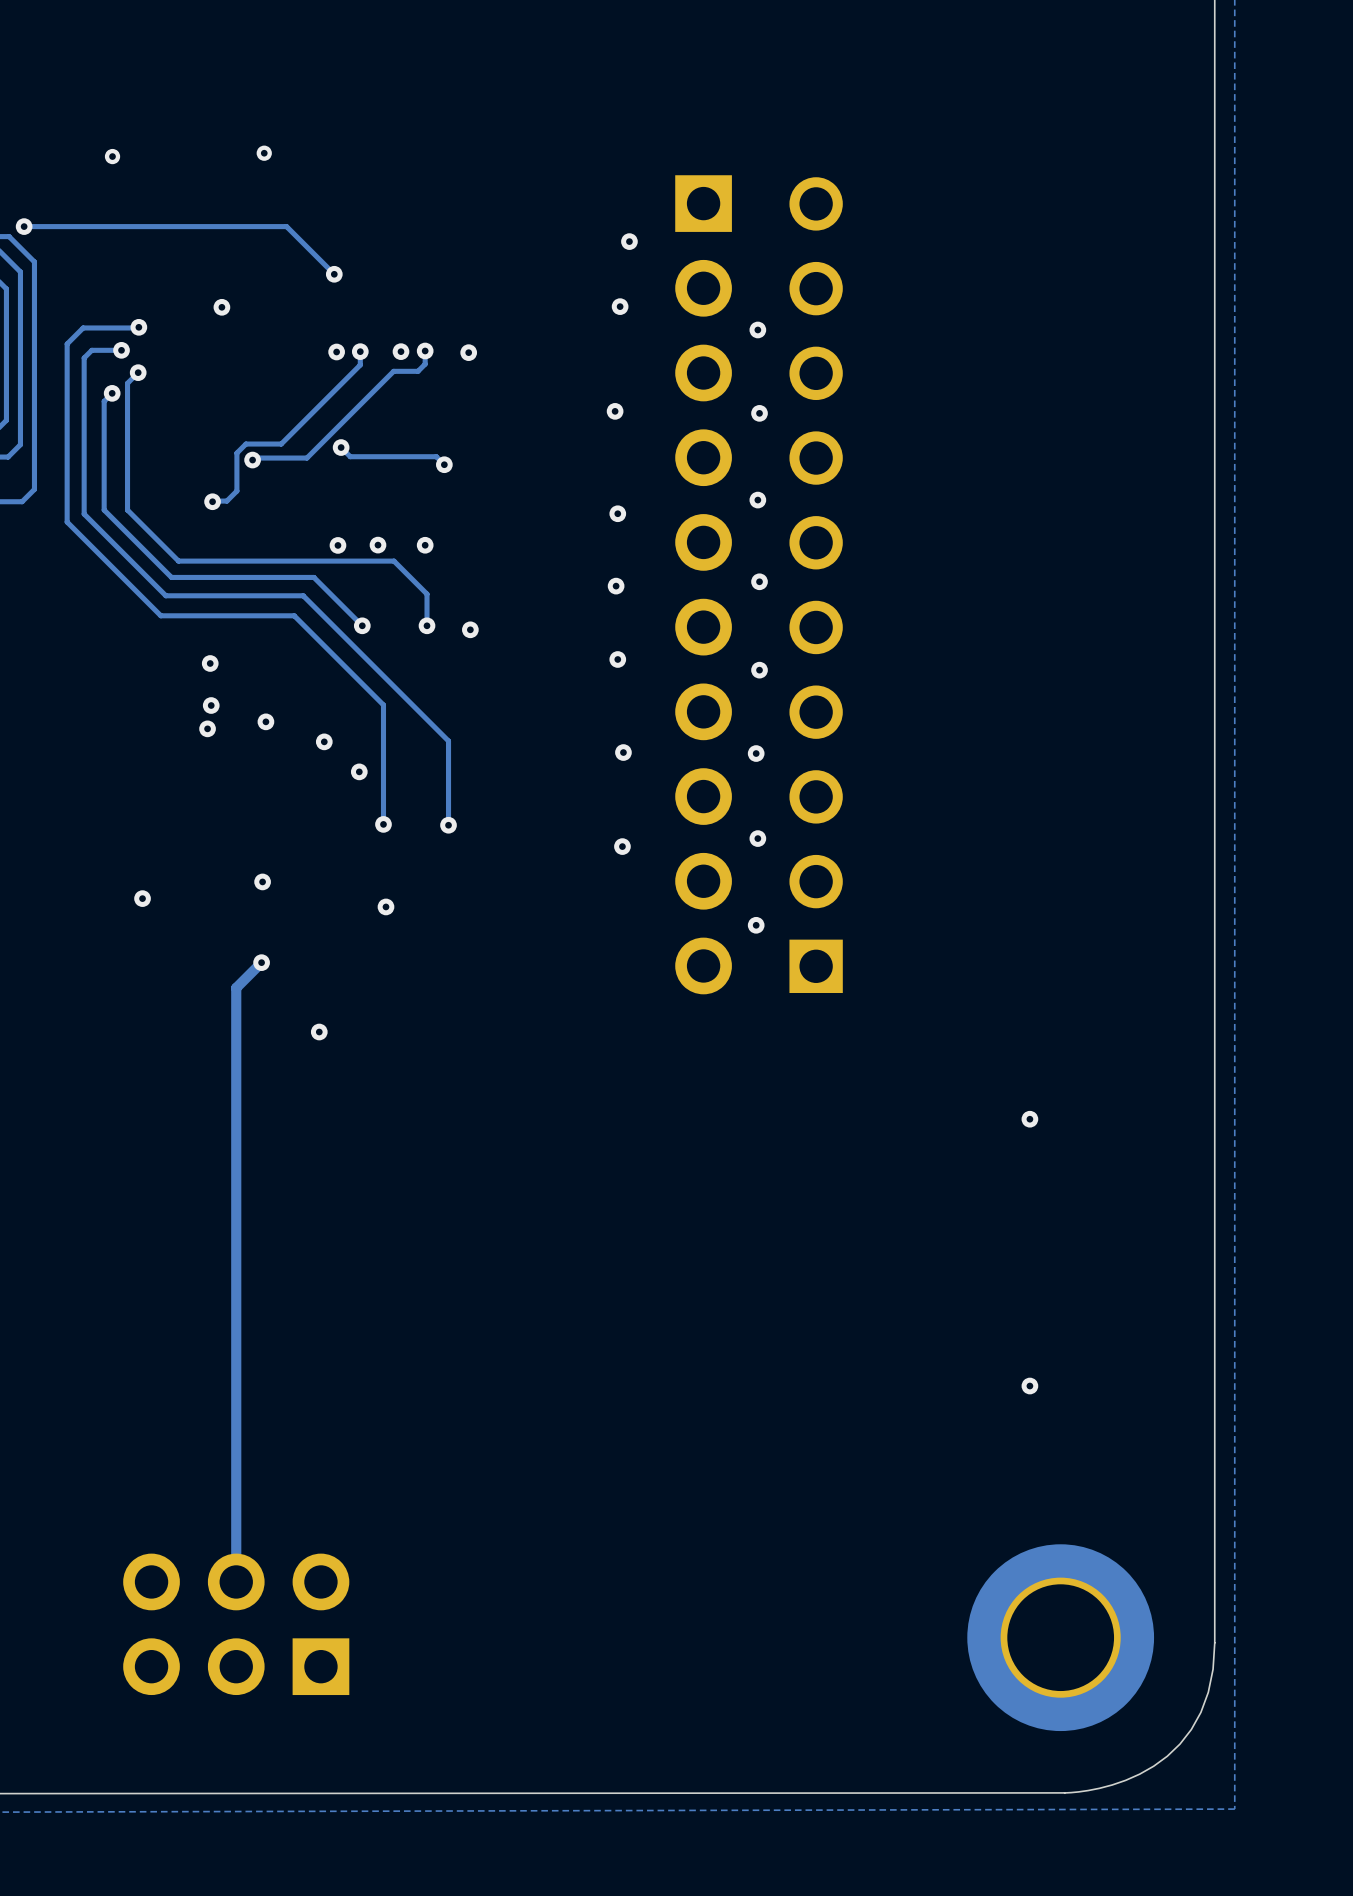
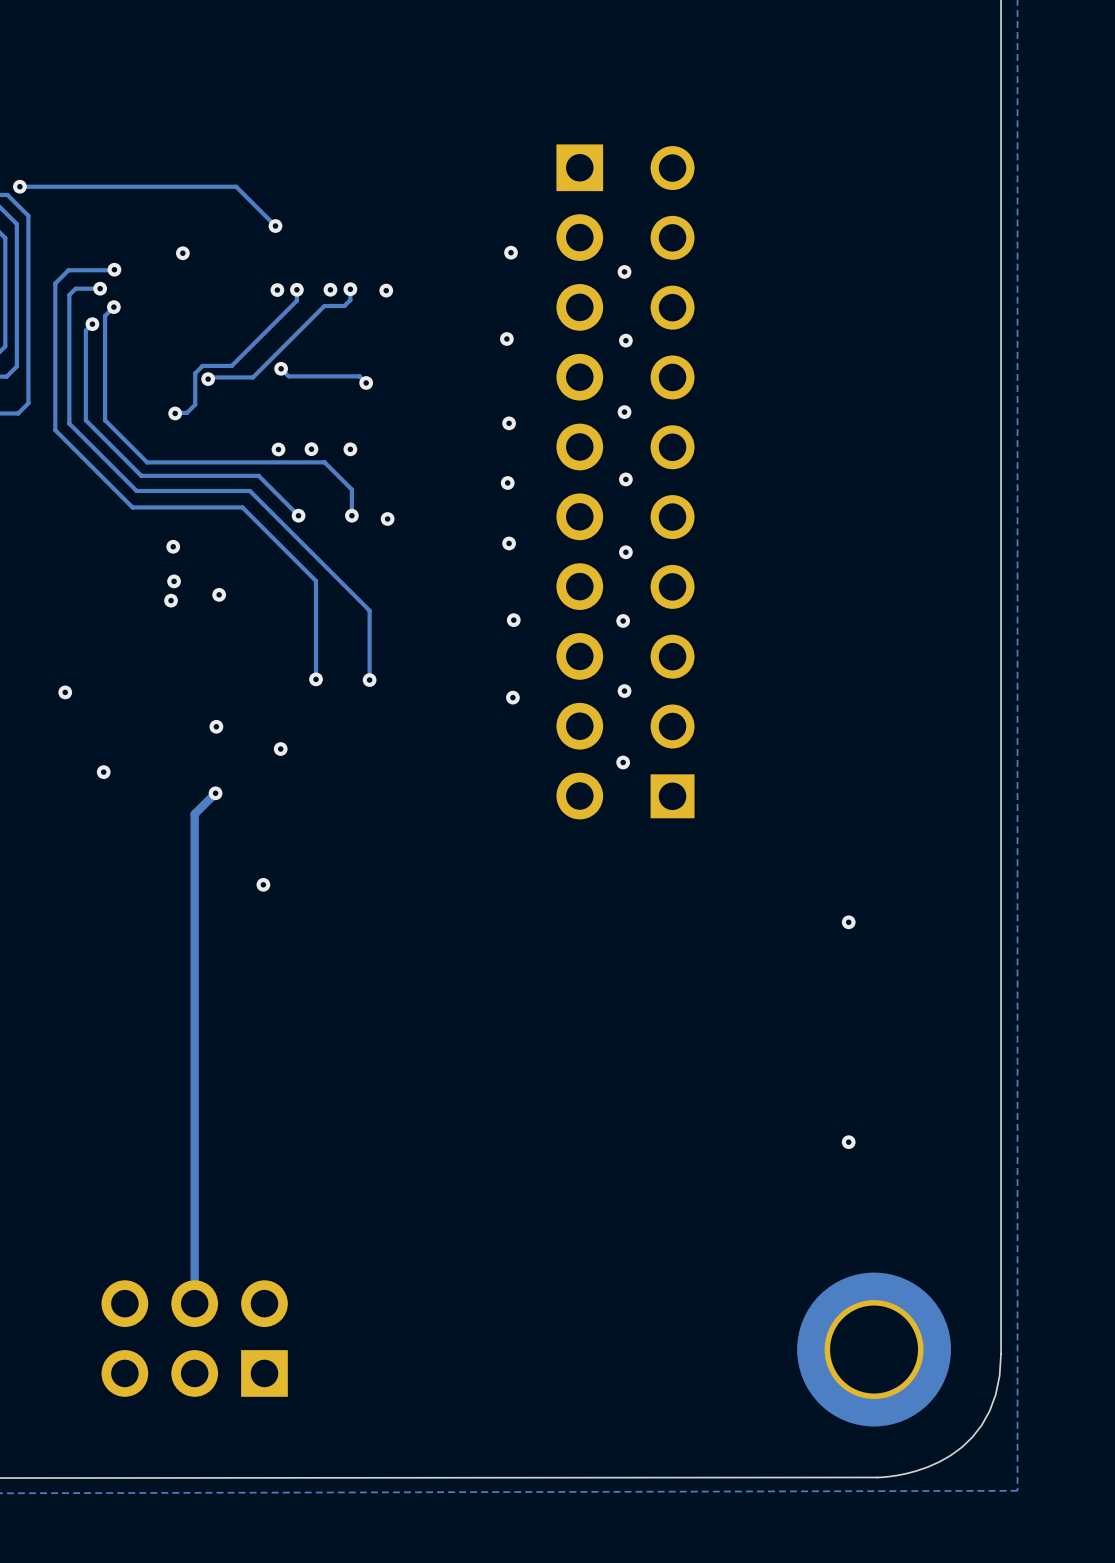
via: (264, 153) -> none
via: (112, 156) -> none
via: (629, 241) -> none
via: (324, 741) -> none
via: (359, 771) -> none
via: none -> (65, 692)
via position: (142, 898) -> (103, 772)
via position: (385, 906) -> (280, 749)
via position: (319, 1032) -> (263, 884)

